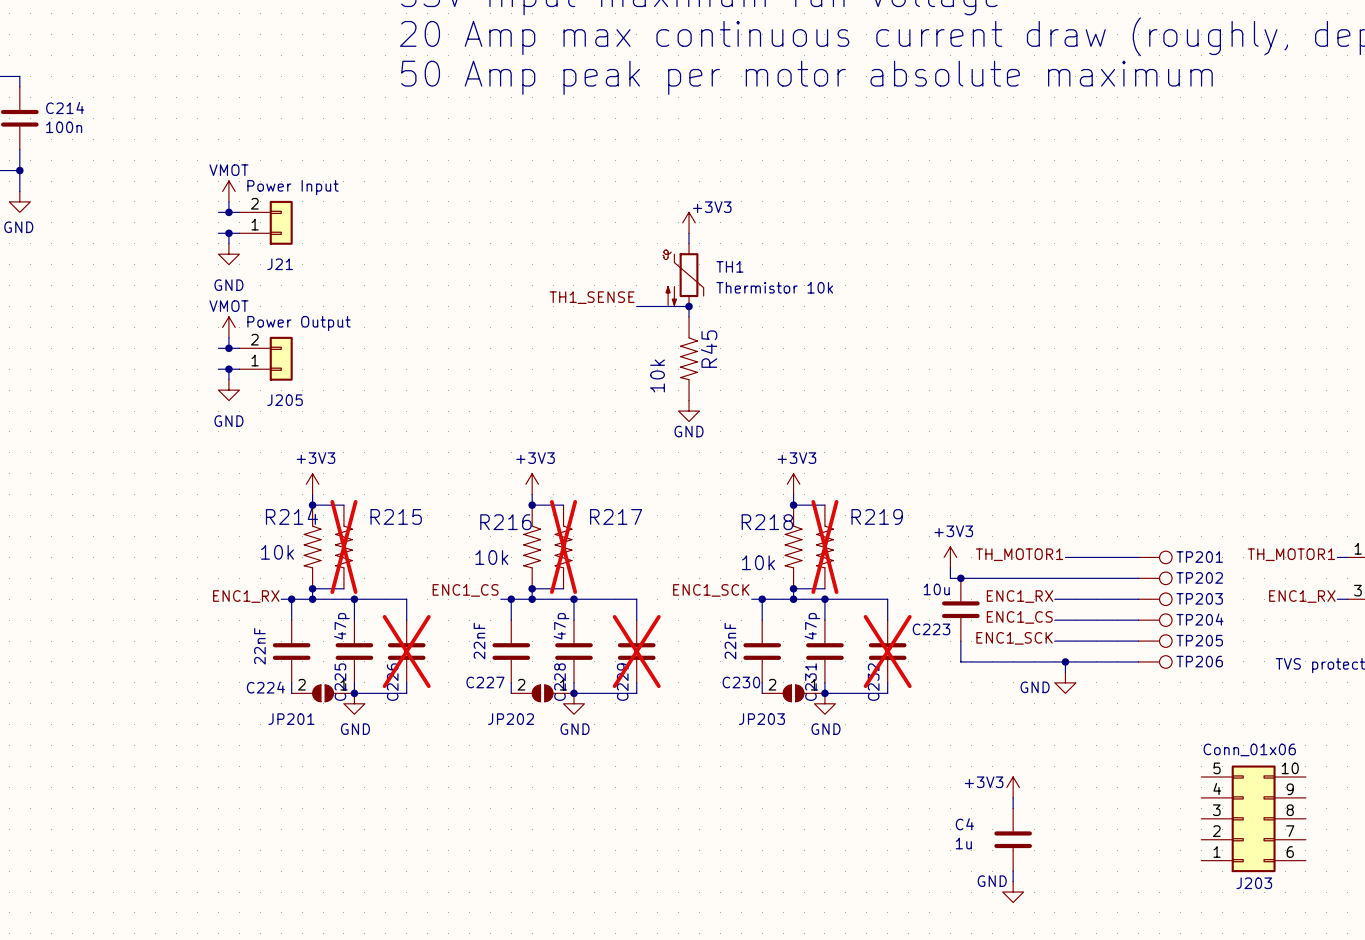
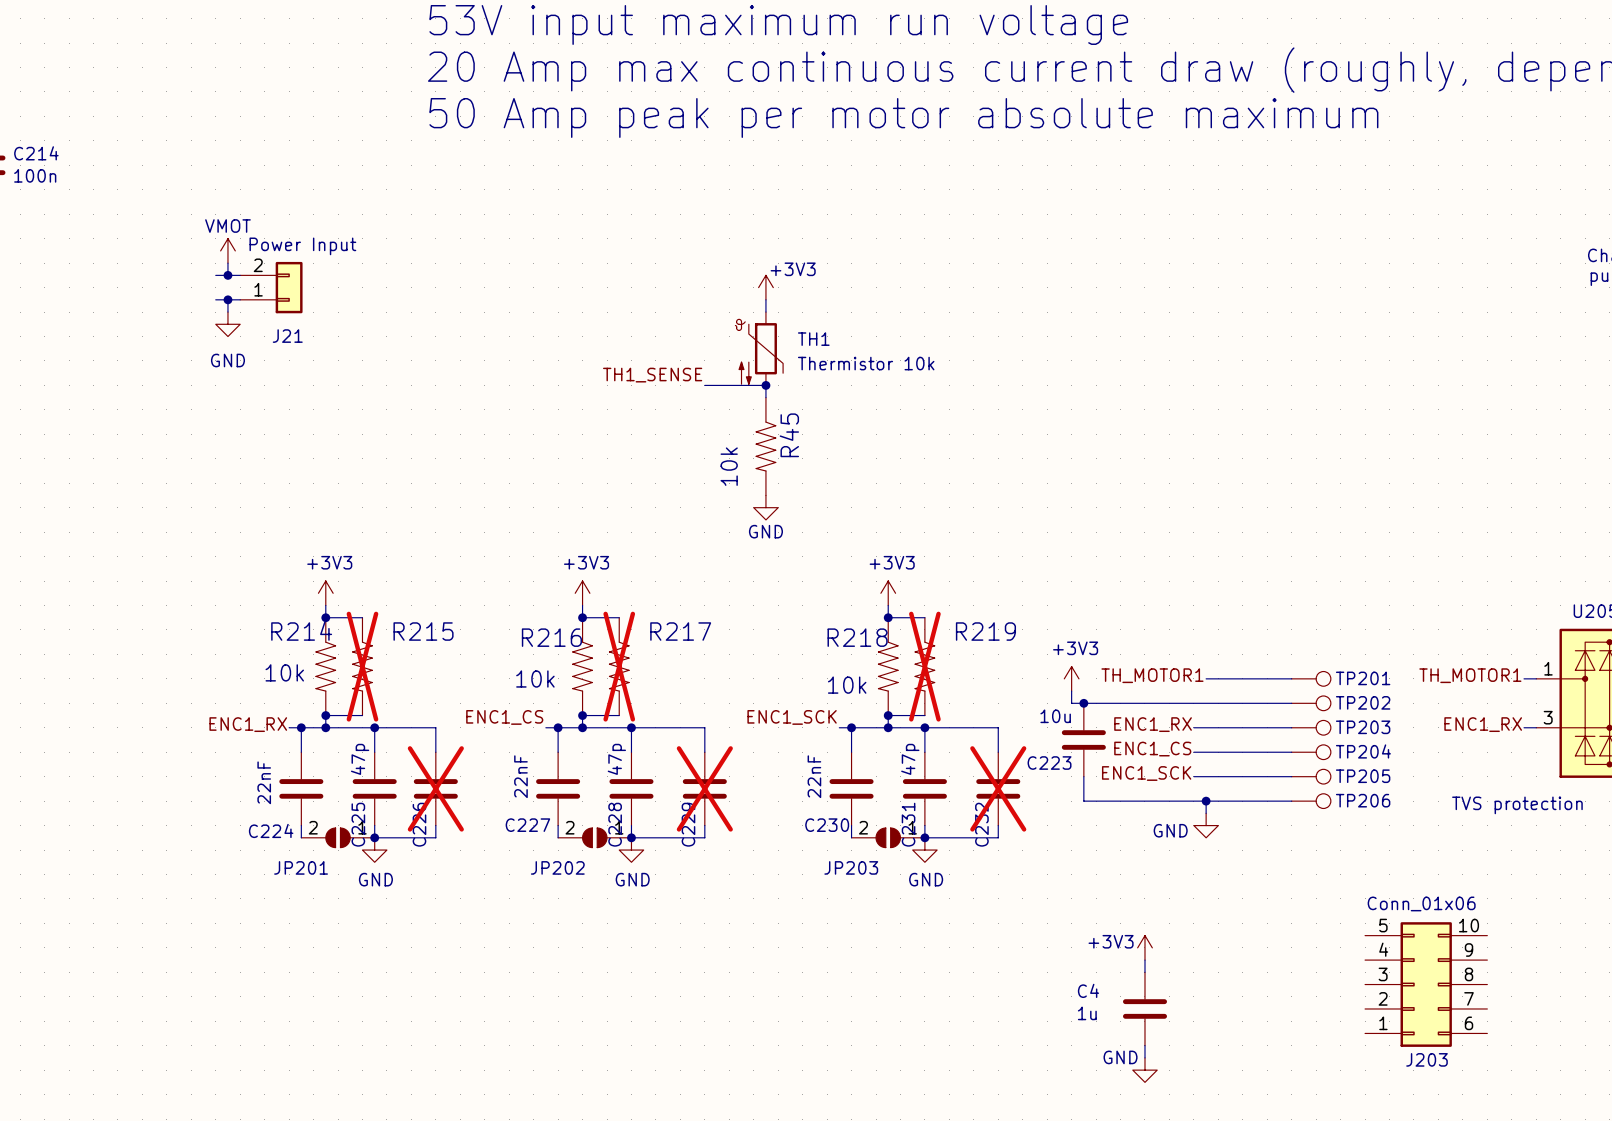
power symbol: VMOT (228, 327) -> none
wire: (228, 337) (228, 348) -> none
wire: (218, 348) (239, 348) -> none
junction: (228, 348) -> none
J205: Power Output (266, 358) -> none
wire: (218, 369) (239, 369) -> none
wire: (228, 369) (228, 379) -> none
junction: (228, 369) -> none
power symbol: GND (228, 390) -> none

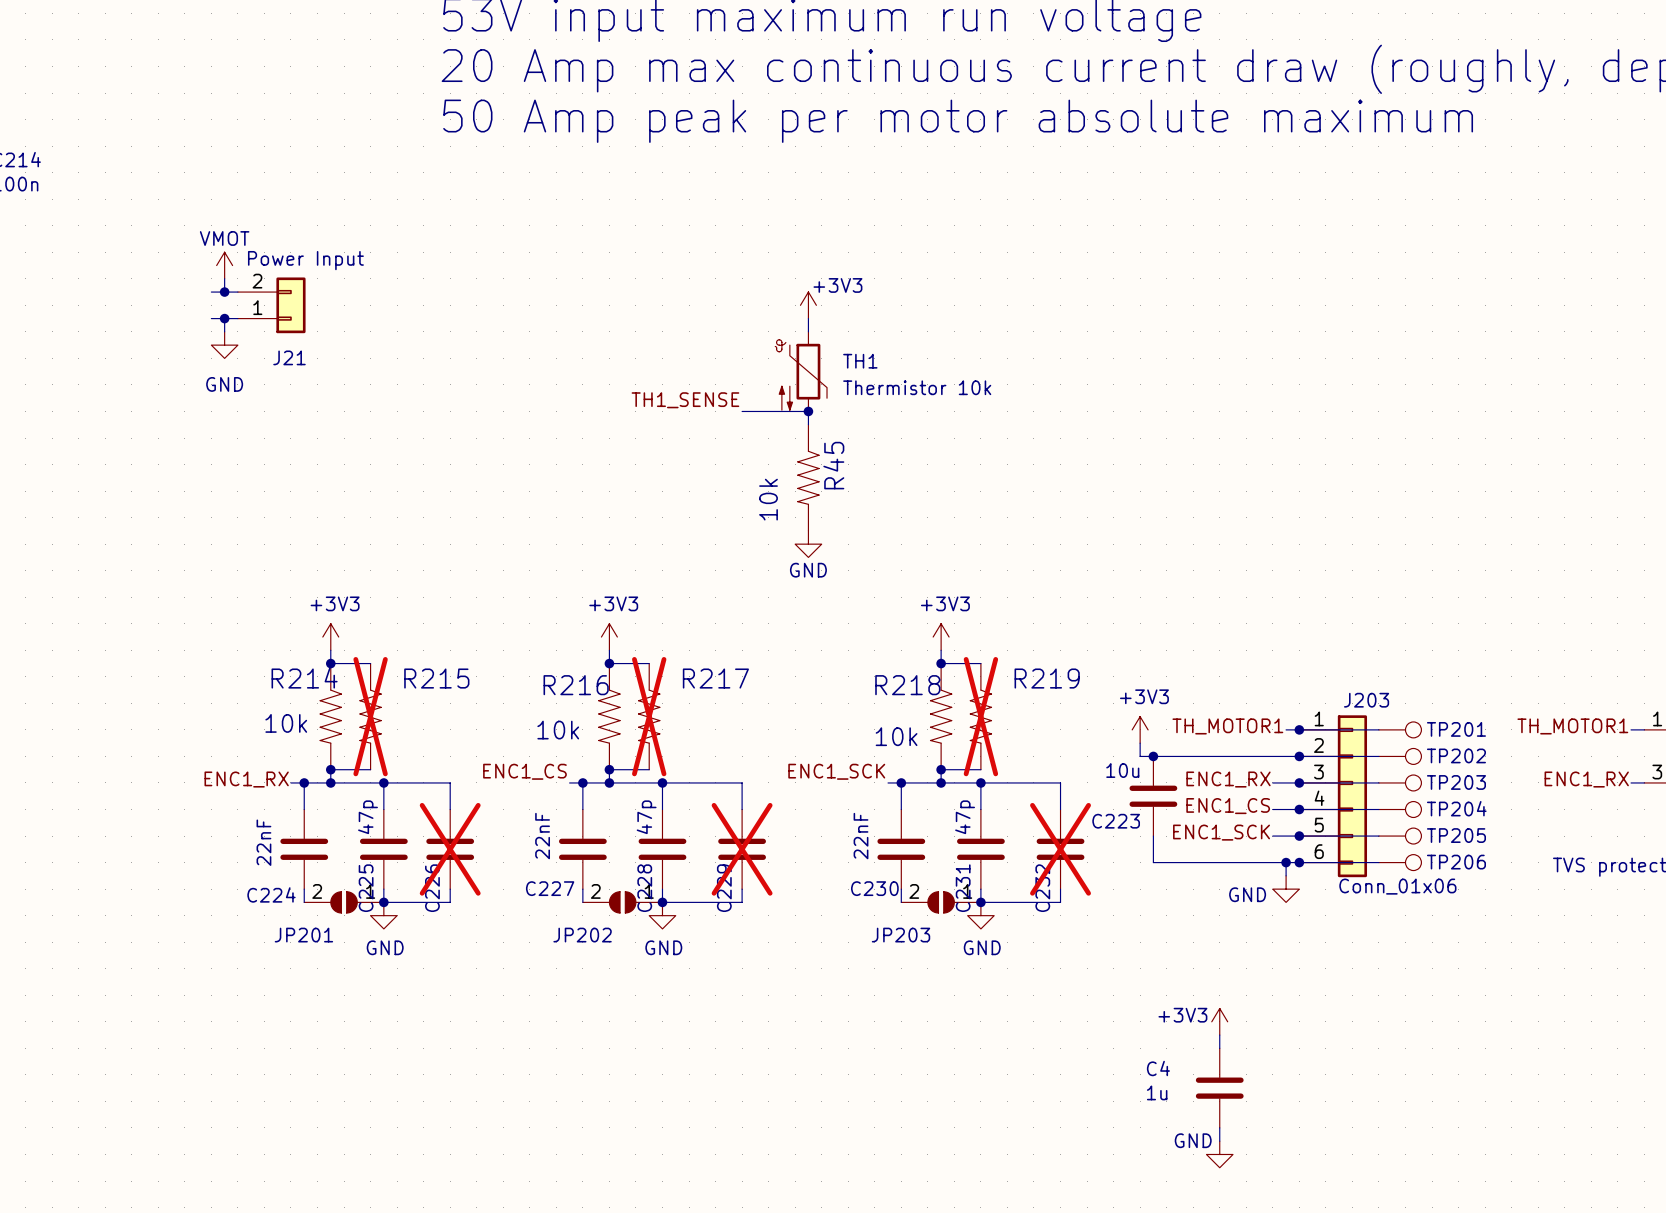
junction: none -> (1299, 729)
junction: none -> (1299, 756)
junction: none -> (1299, 782)
junction: none -> (1299, 809)
junction: none -> (1299, 836)
junction: none -> (1299, 862)
J203 value position: Conn_01x06 (1421, 903) -> Conn_01x06 (1397, 886)
J203 symbol: [1365, 922, 1488, 1047] -> [1299, 715, 1368, 878]
J203 name position: J203 (1427, 1059) -> J203 (1366, 700)

